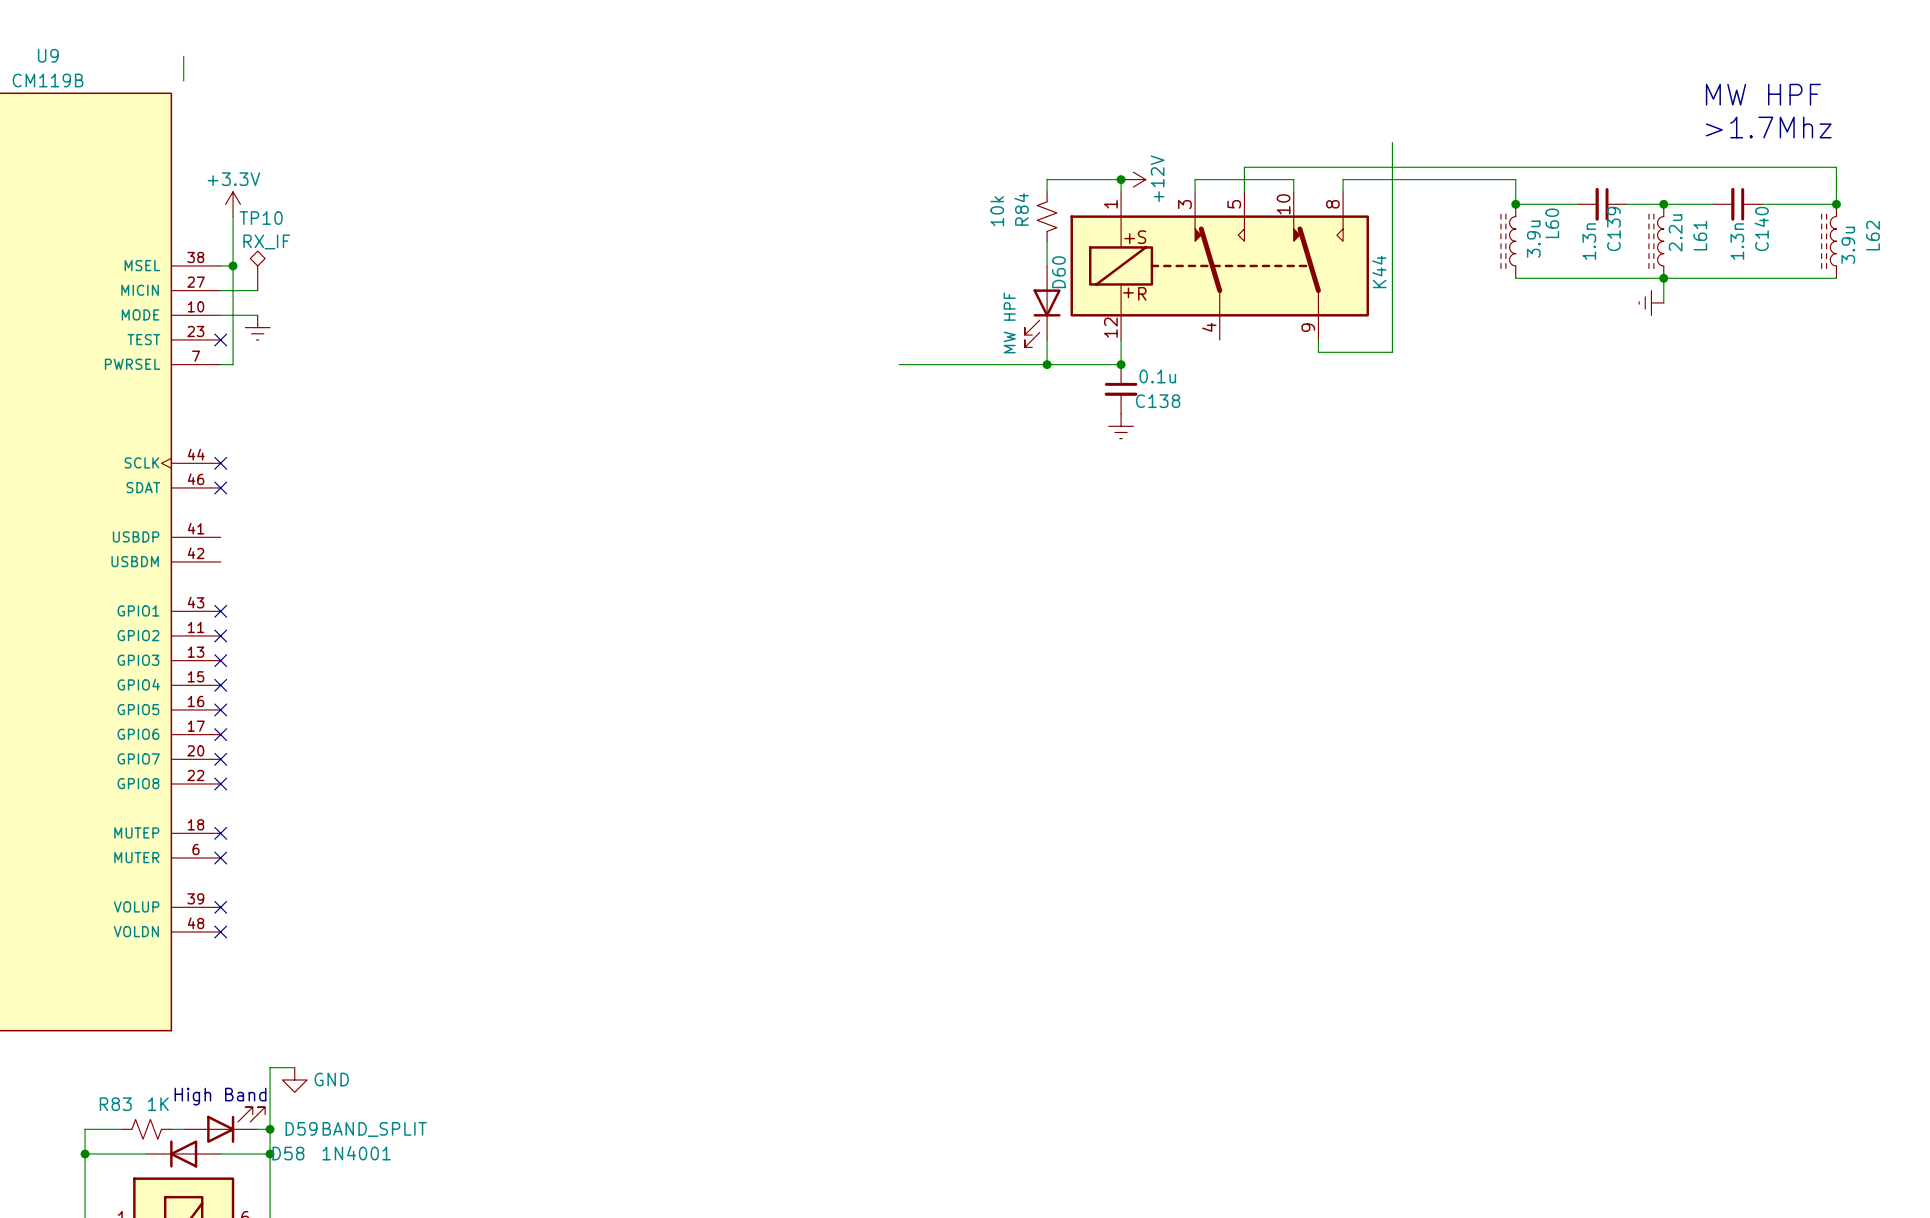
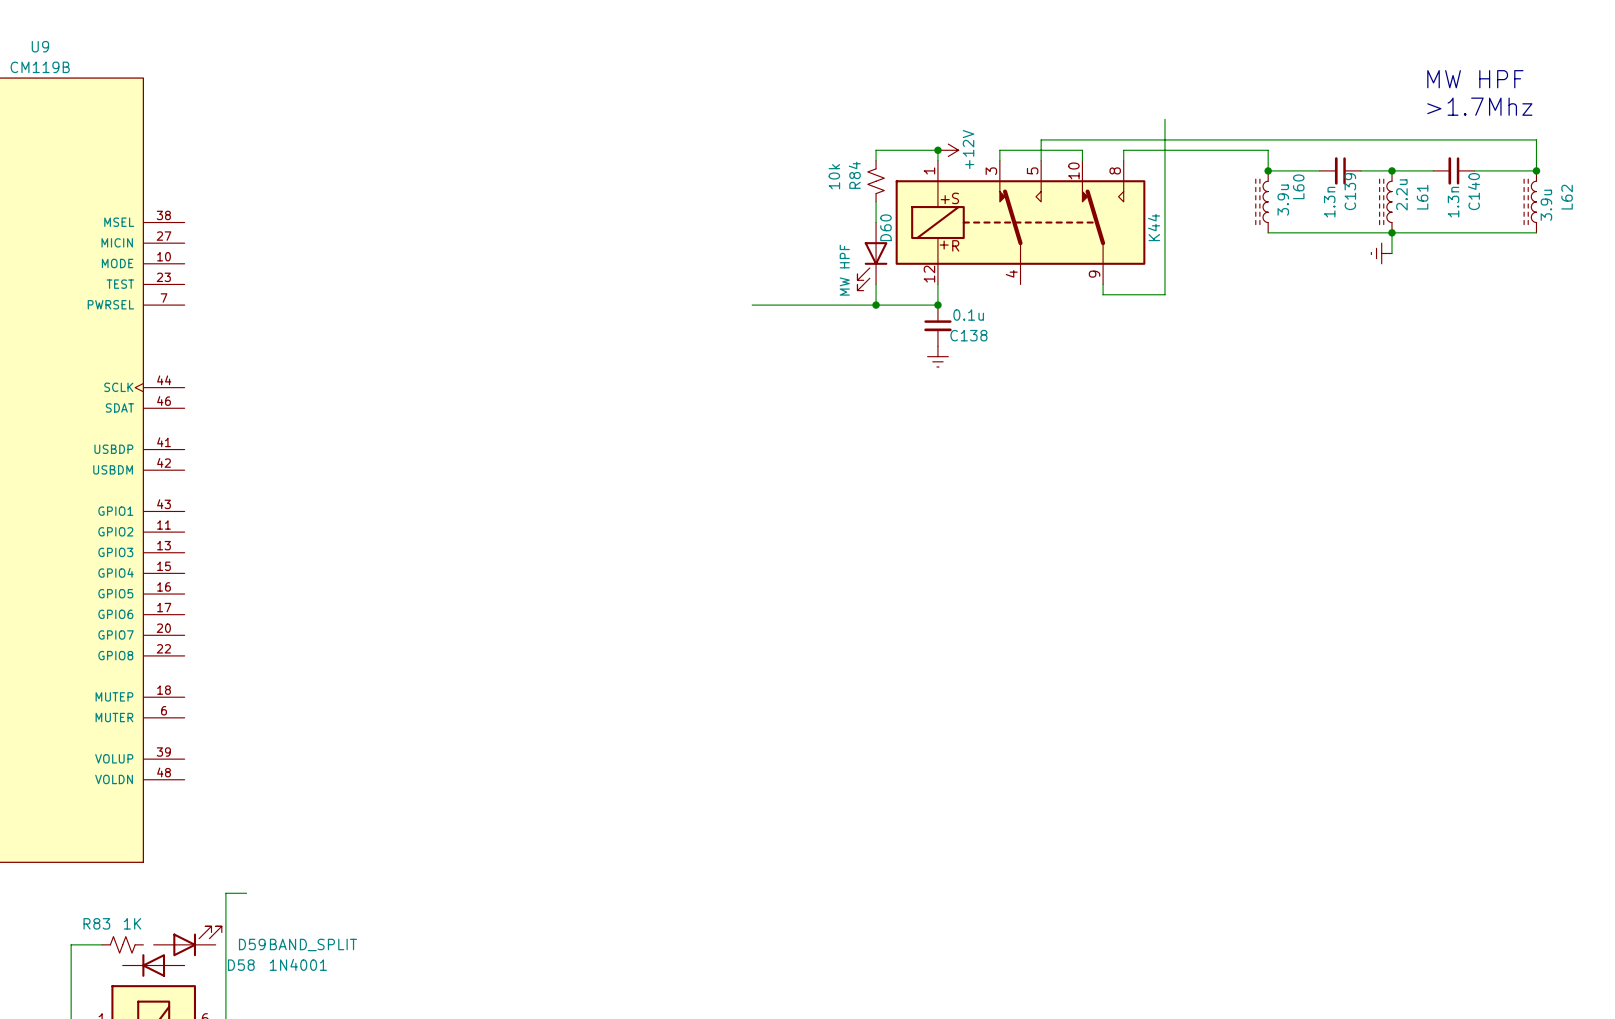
wire: (183, 56) (183, 80) -> none
power symbol: +3.3V (233, 204) -> none
wire: (233, 216) (233, 364) (220, 364) -> none
wire: (220, 265) (233, 265) -> none
junction: (233, 265) -> none
TP10: RX_IF (257, 270) -> none
wire: (220, 290) (257, 290) -> none
wire: (220, 315) (257, 315) -> none
power symbol: (257, 327) -> none
no-connect mark: (220, 339) -> none
no-connect mark: (220, 463) -> none
no-connect mark: (220, 487) -> none
no-connect mark: (220, 611) -> none
no-connect mark: (220, 635) -> none
no-connect mark: (220, 660) -> none
no-connect mark: (220, 685) -> none
no-connect mark: (220, 709) -> none
no-connect mark: (220, 734) -> none
no-connect mark: (220, 759) -> none
no-connect mark: (220, 783) -> none
no-connect mark: (220, 833) -> none
no-connect mark: (220, 857) -> none
no-connect mark: (220, 907) -> none
no-connect mark: (220, 931) -> none
power symbol: GND (294, 1080) -> none
text: High Band (220, 1096) -> none
wire: (171, 1129) (183, 1129) -> none
wire: (257, 1129) (270, 1129) -> none
junction: (270, 1129) -> none
wire: (85, 1154) (146, 1154) -> none
junction: (85, 1154) -> none
wire: (220, 1154) (270, 1154) -> none
junction: (270, 1154) -> none

